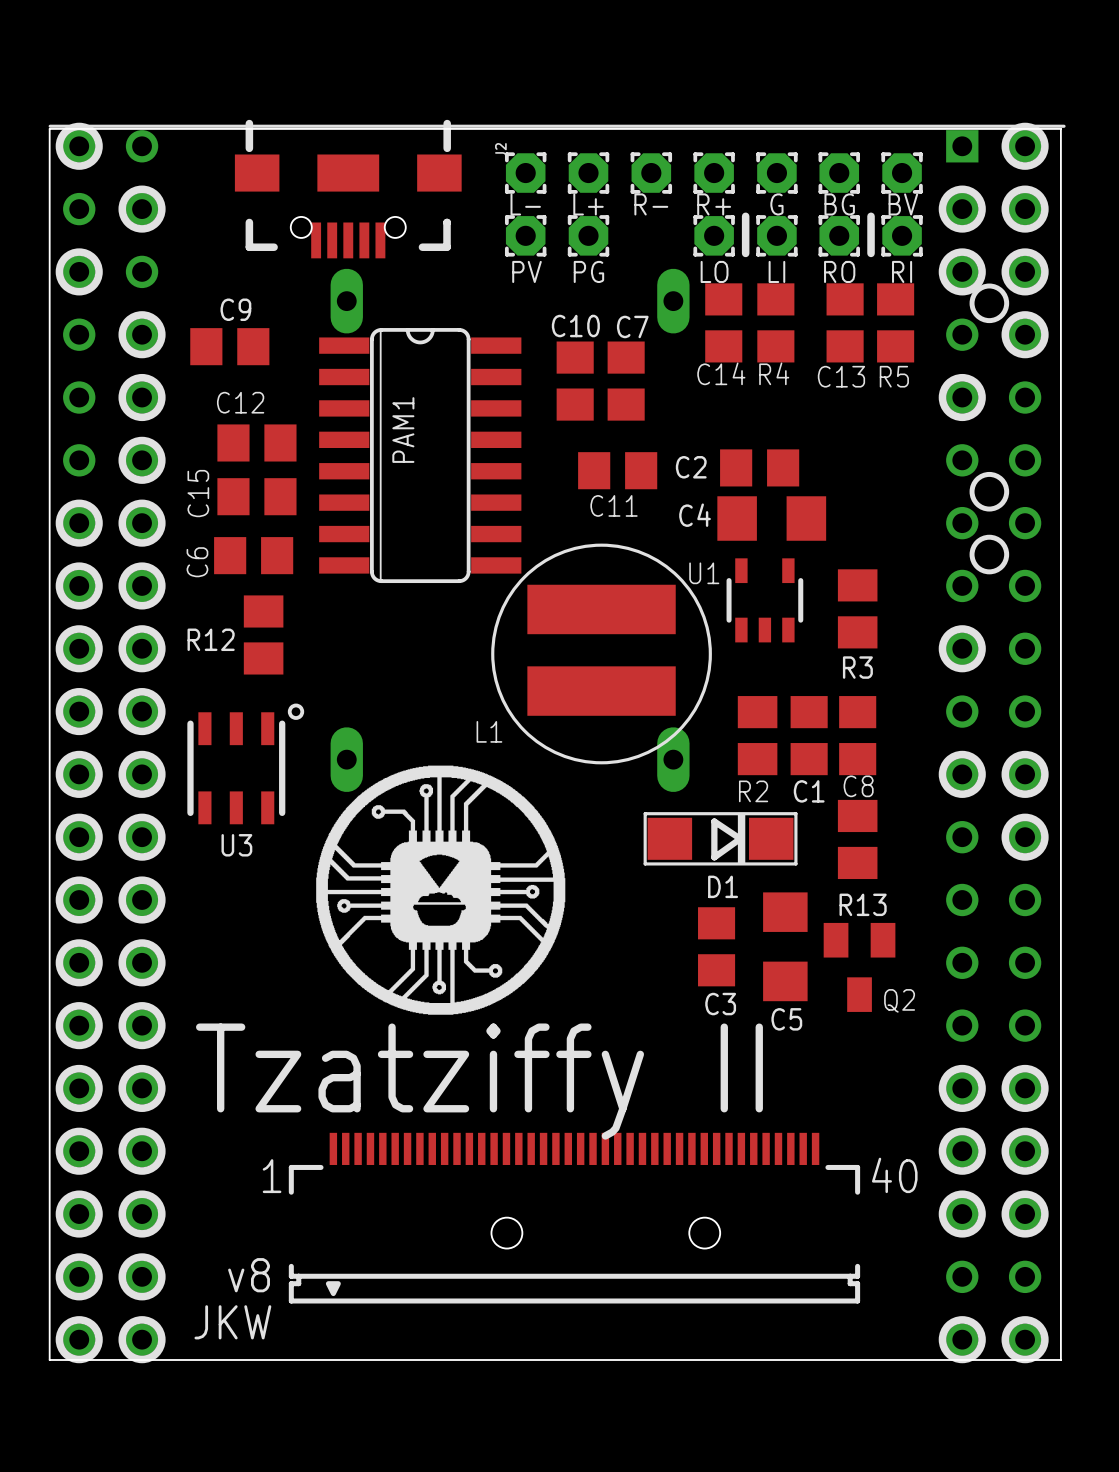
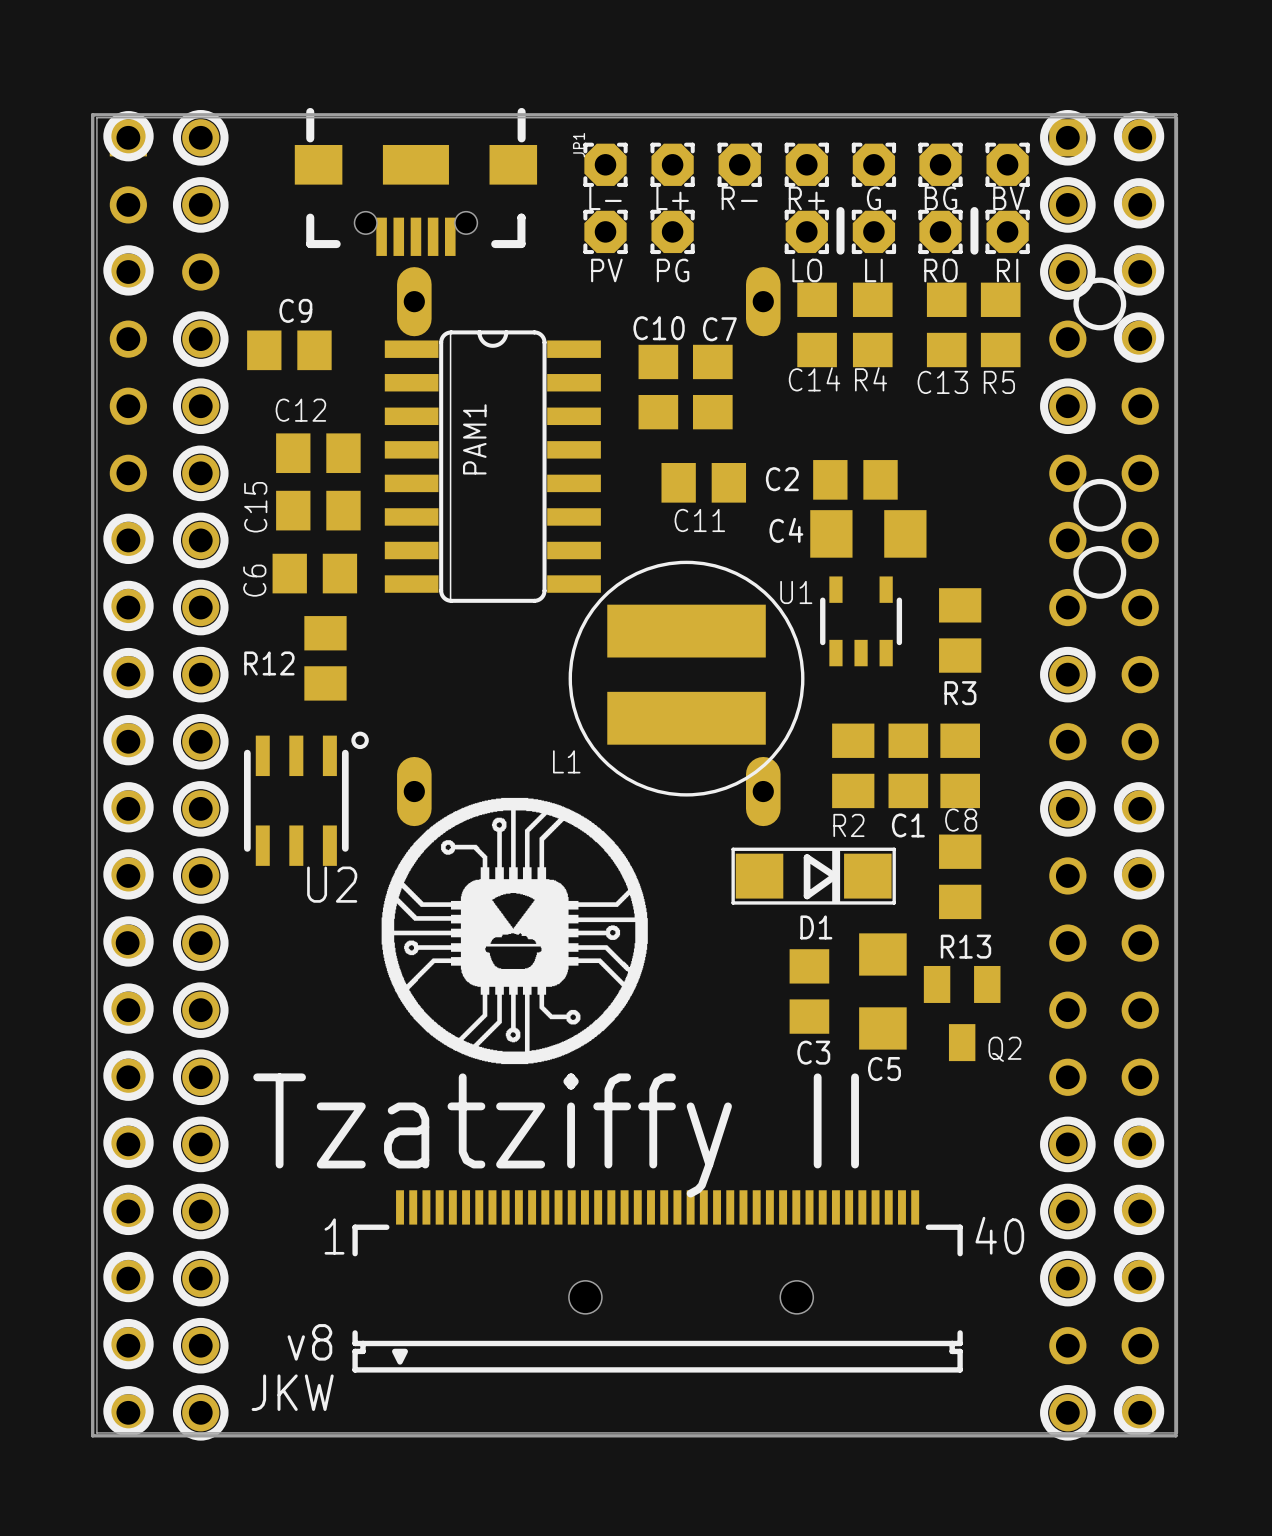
drawing: none -> [172, 110, 229, 166]
drawing: none -> [1040, 110, 1096, 166]
part footprint: [48, 124, 1066, 1356] -> [91, 113, 1178, 1438]
J2 name: J2 (500, 150) -> JP1 (579, 145)
drawing shape: [118, 185, 166, 233] -> [172, 177, 229, 233]
drawing shape: [938, 185, 986, 233] -> [1040, 177, 1096, 233]
drawing shape: [938, 248, 986, 296] -> [1040, 244, 1096, 300]
drawing shape: [969, 283, 1010, 324] -> [1073, 277, 1127, 331]
drawing shape: [118, 311, 166, 359] -> [172, 311, 229, 367]
drawing shape: [118, 373, 166, 422] -> [172, 378, 229, 435]
drawing shape: [938, 373, 986, 422] -> [1040, 378, 1096, 435]
drawing shape: [118, 436, 166, 484] -> [172, 445, 229, 502]
drawing shape: [969, 471, 1010, 512] -> [1073, 478, 1127, 532]
drawing shape: [118, 499, 166, 547] -> [172, 512, 229, 569]
drawing shape: [969, 534, 1010, 575] -> [1073, 545, 1127, 599]
drawing shape: [118, 562, 166, 610] -> [172, 579, 229, 636]
drawing shape: [118, 625, 166, 673] -> [172, 646, 229, 703]
drawing shape: [938, 625, 986, 673] -> [1040, 646, 1096, 703]
drawing shape: [118, 688, 166, 736] -> [172, 713, 229, 770]
drawing shape: [118, 750, 166, 798] -> [172, 781, 229, 837]
drawing shape: [938, 750, 986, 798] -> [1040, 781, 1096, 837]
U3: (245, 763) -> none
U2: none -> (306, 798)
drawing shape: [118, 813, 166, 861] -> [172, 848, 229, 904]
drawing shape: [118, 876, 166, 924] -> [172, 915, 229, 971]
drawing shape: [118, 939, 166, 987] -> [172, 982, 229, 1038]
drawing shape: [118, 1002, 166, 1050] -> [172, 1049, 229, 1106]
drawing shape: [118, 1064, 166, 1112] -> [172, 1116, 229, 1173]
drawing shape: [938, 1064, 986, 1112] -> [1040, 1116, 1096, 1173]
drawing shape: [118, 1127, 166, 1175] -> [172, 1183, 229, 1240]
drawing shape: [938, 1127, 986, 1175] -> [1040, 1183, 1096, 1240]
drawing shape: [118, 1190, 166, 1238] -> [172, 1250, 229, 1307]
drawing shape: [938, 1190, 986, 1238] -> [1040, 1250, 1096, 1307]
drawing shape: [118, 1253, 166, 1301] -> [172, 1317, 229, 1374]
drawing shape: [118, 1316, 166, 1364] -> [172, 1385, 229, 1441]
drawing shape: [938, 1316, 986, 1364] -> [1040, 1385, 1096, 1441]

